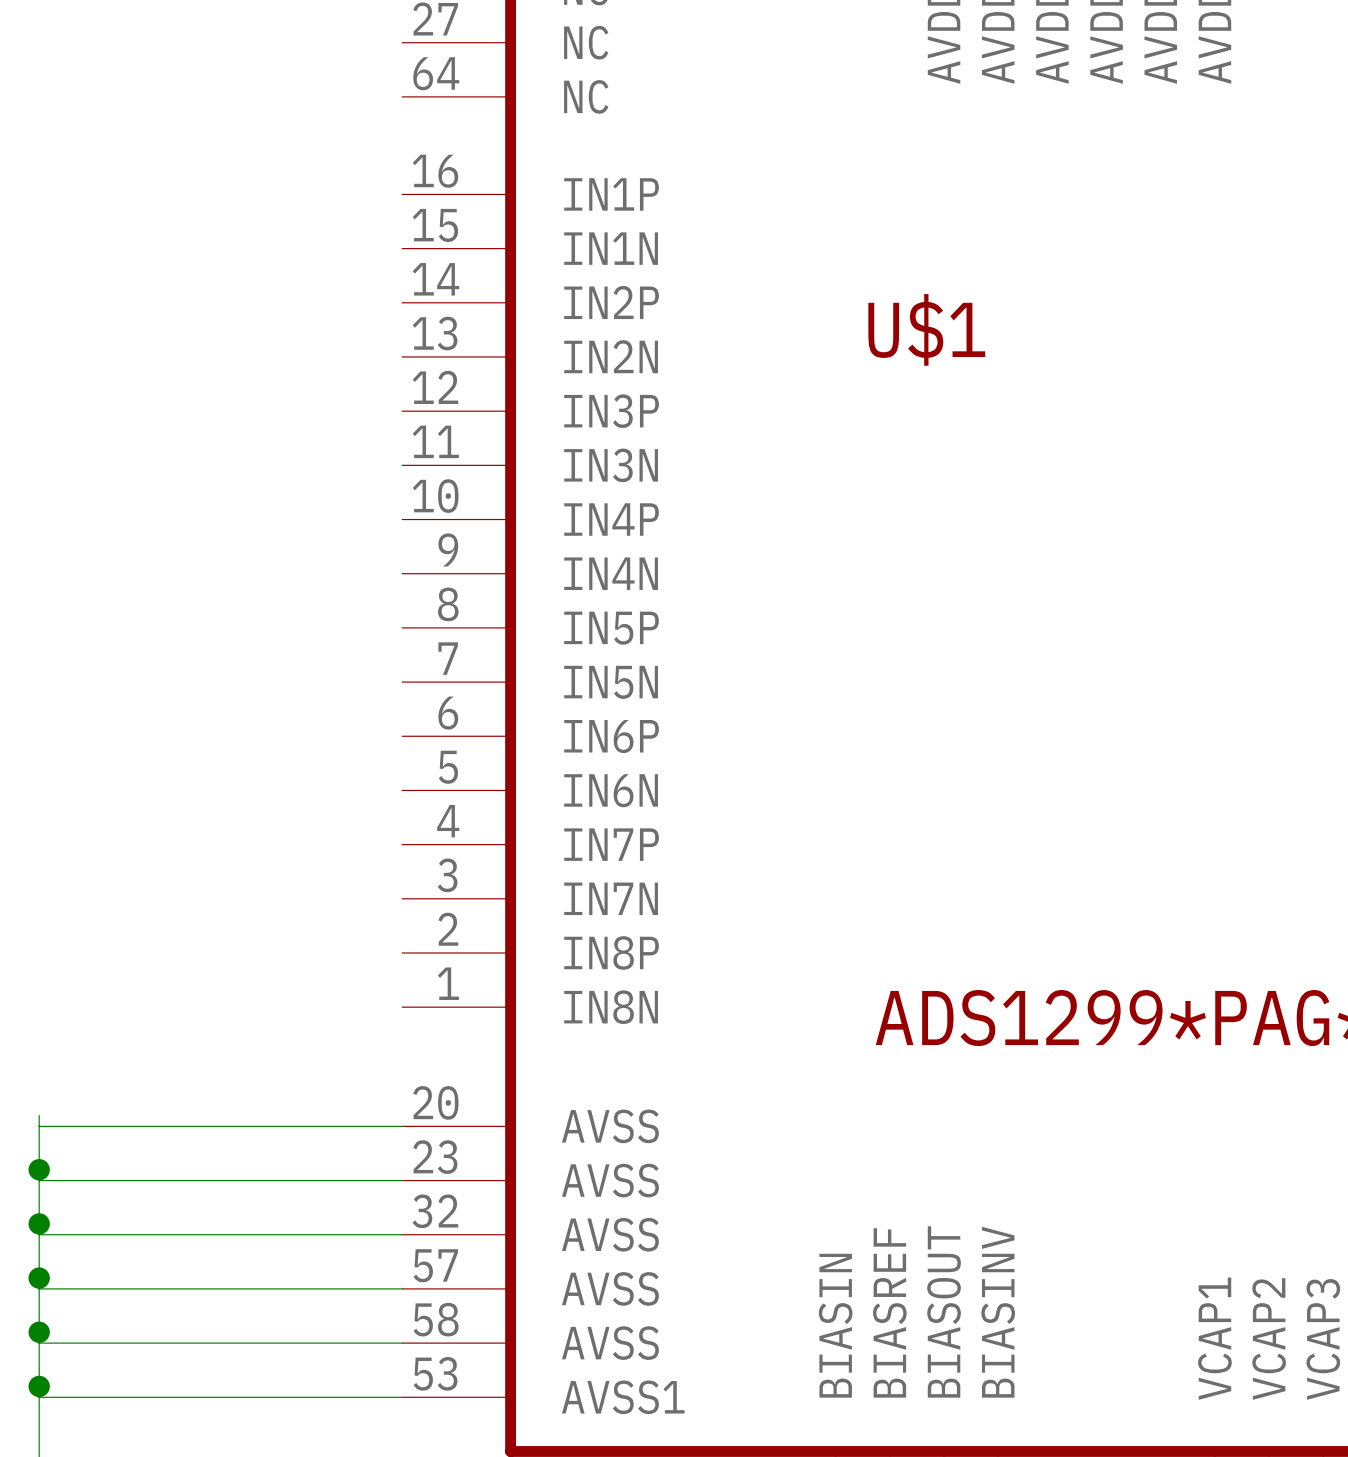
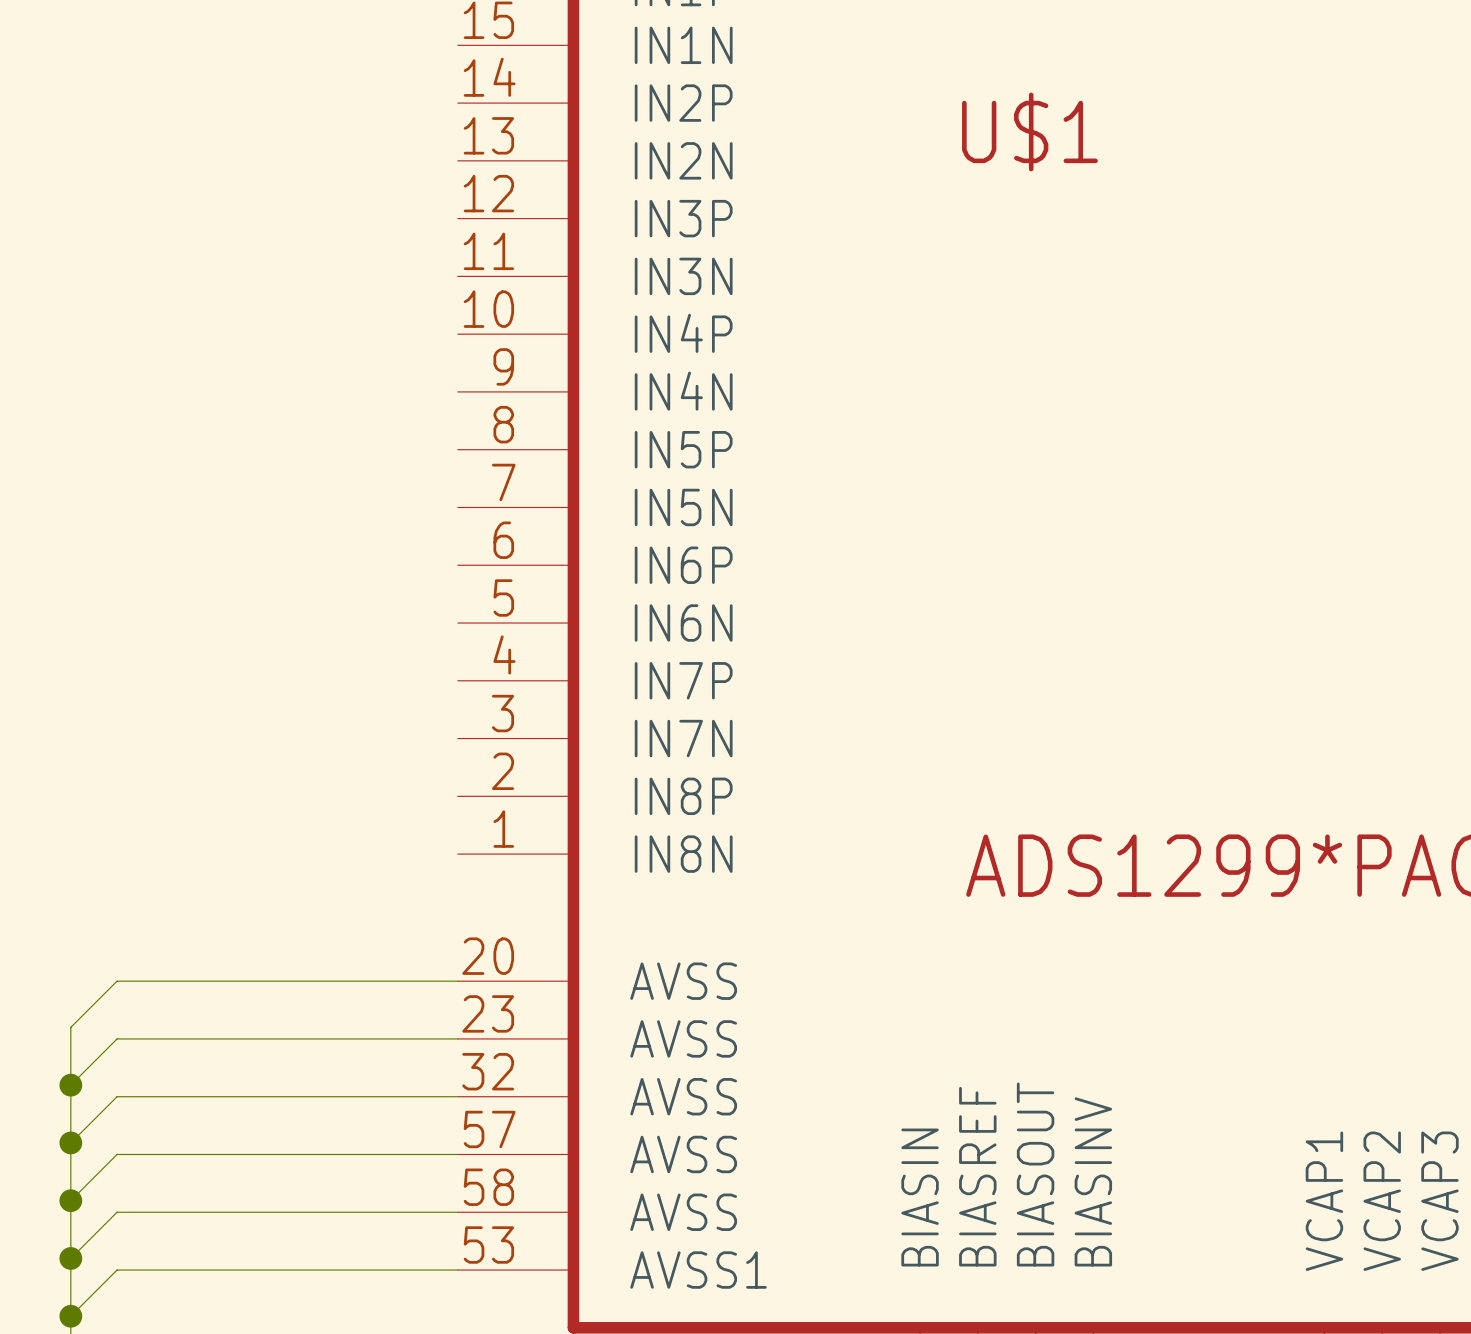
wire: (39, 1115) (39, 1169) -> none
wire: (39, 1126) (82, 1126) -> (70, 1027) (117, 981)
junction: (39, 1169) -> none
wire: (39, 1180) (82, 1180) -> (70, 1085) (117, 1038)
wire: (39, 1234) (82, 1234) -> (70, 1142) (117, 1096)
wire: (39, 1288) (82, 1288) -> (70, 1200) (117, 1154)
wire: (39, 1343) (82, 1343) -> (70, 1258) (117, 1212)
wire: (39, 1397) (82, 1397) -> (70, 1316) (117, 1270)
junction: none -> (70, 1316)

